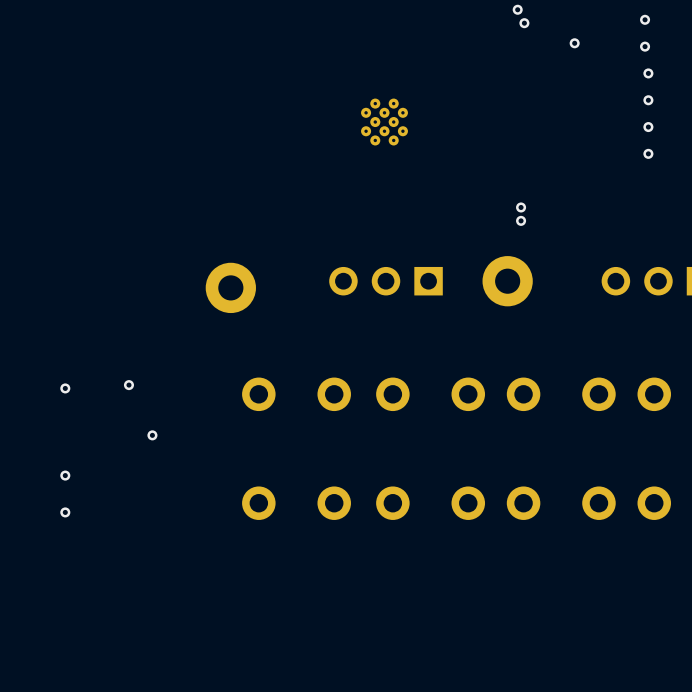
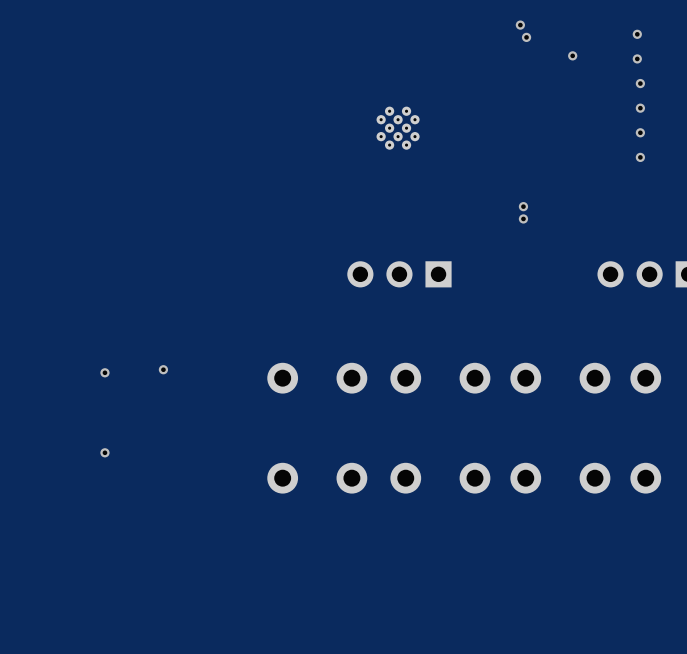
part: (507, 281) -> none
part: (230, 287) -> none
via: (152, 435) -> none
via: (65, 512) -> none

